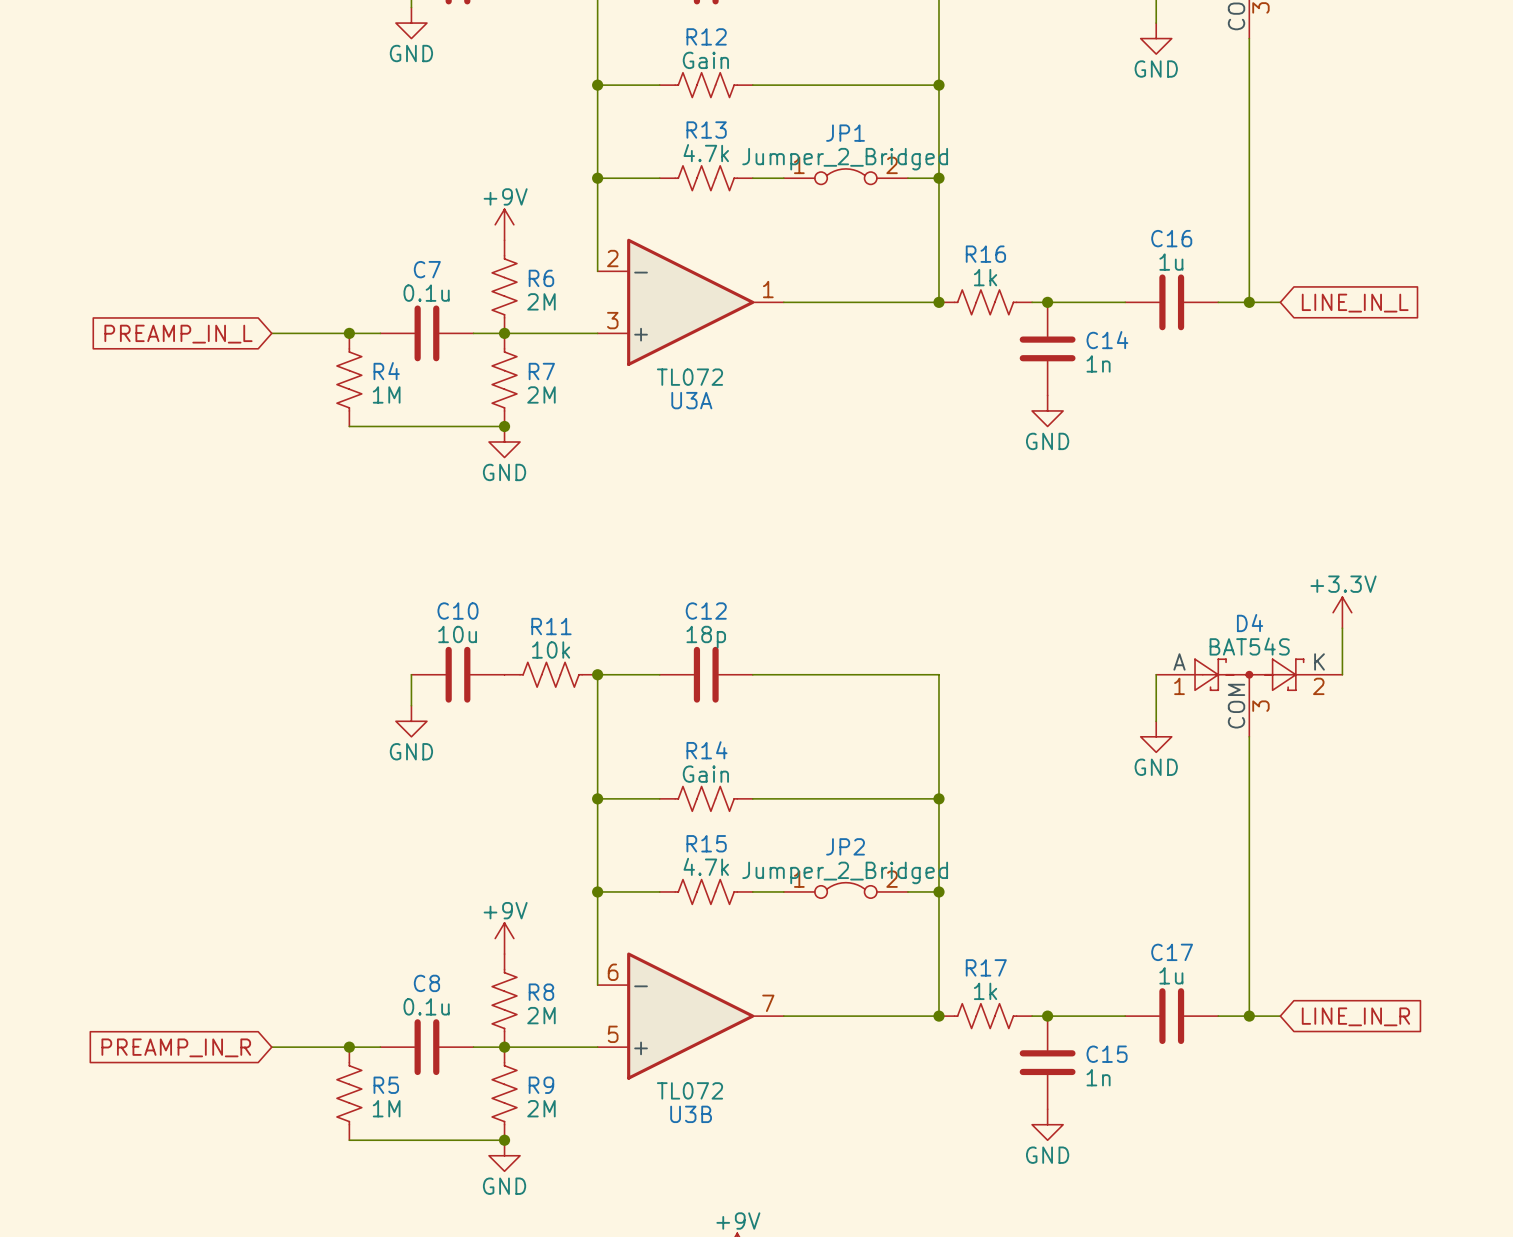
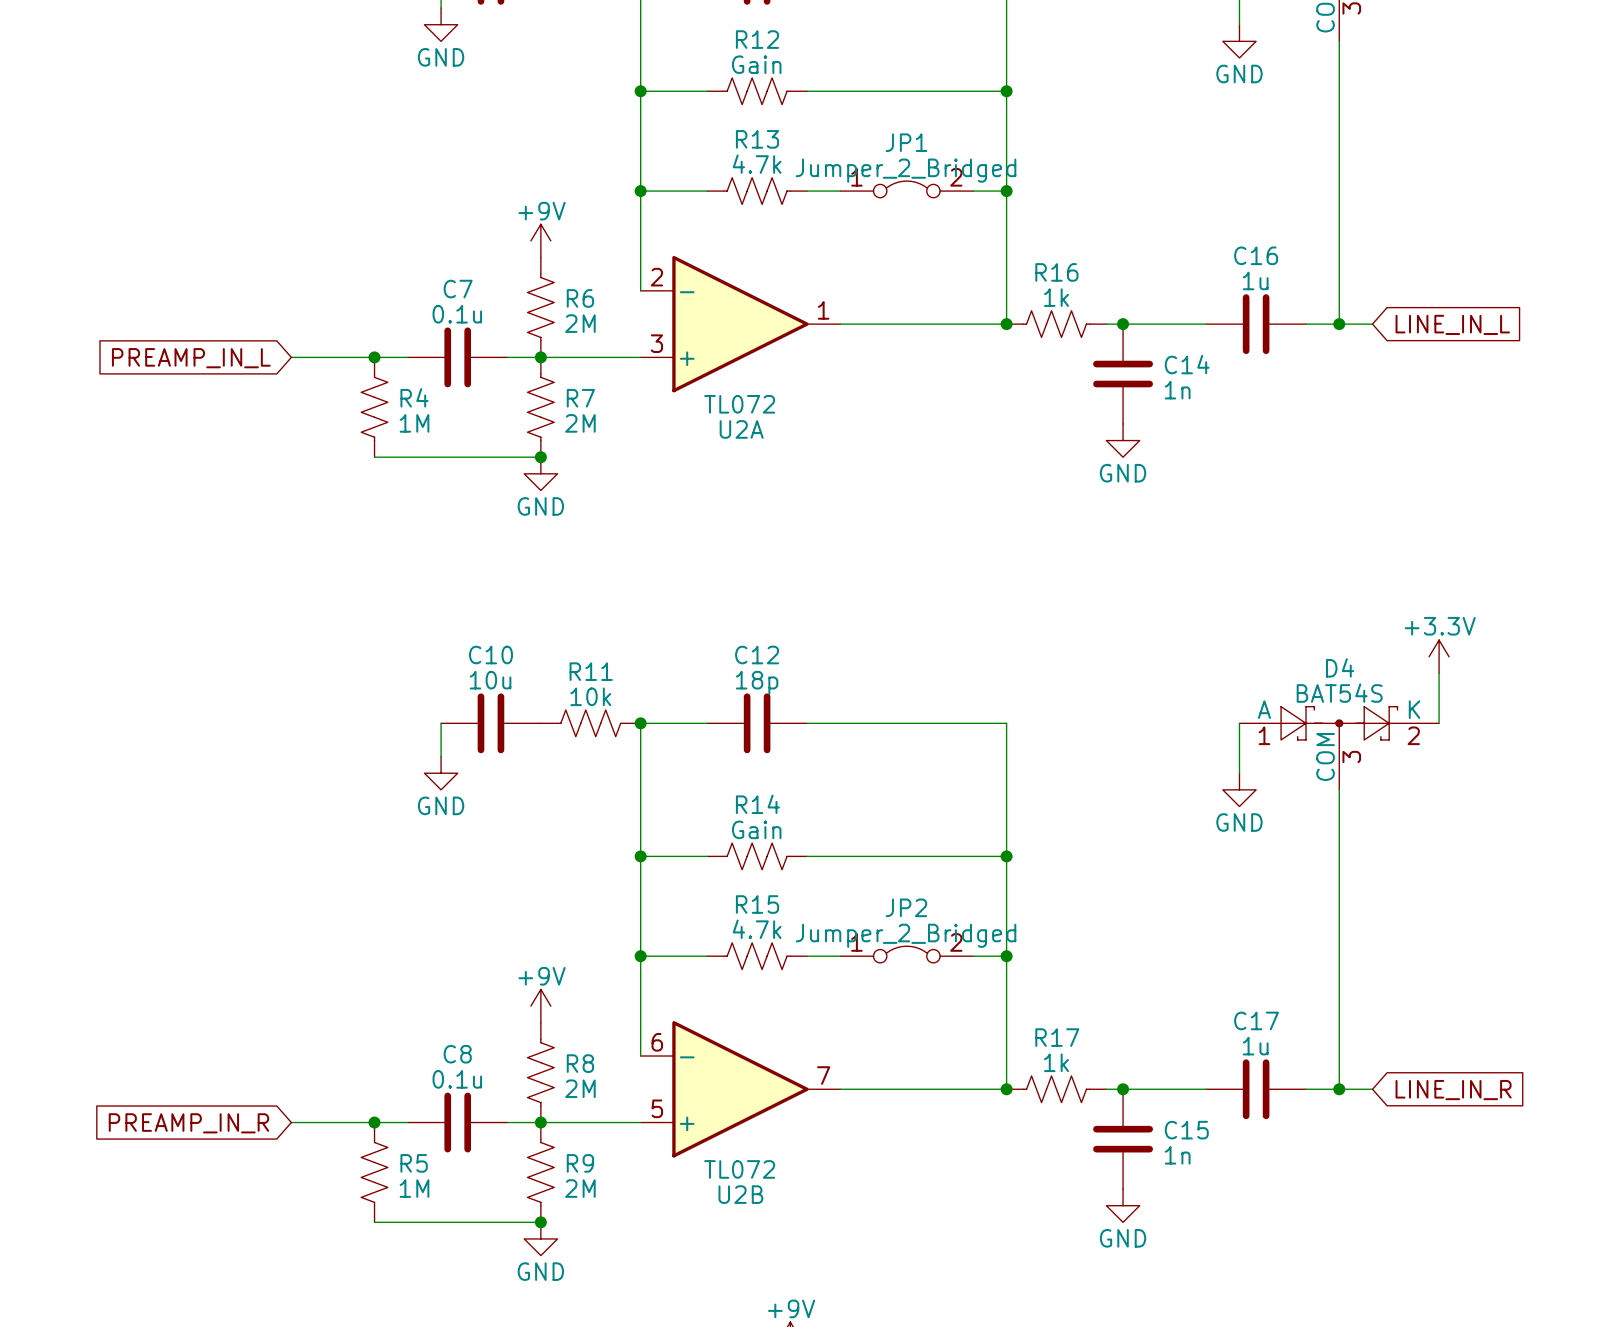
U3A name: U3A (691, 400) -> U2A (741, 429)
U3B name: U3B (691, 1114) -> U2B (740, 1194)

